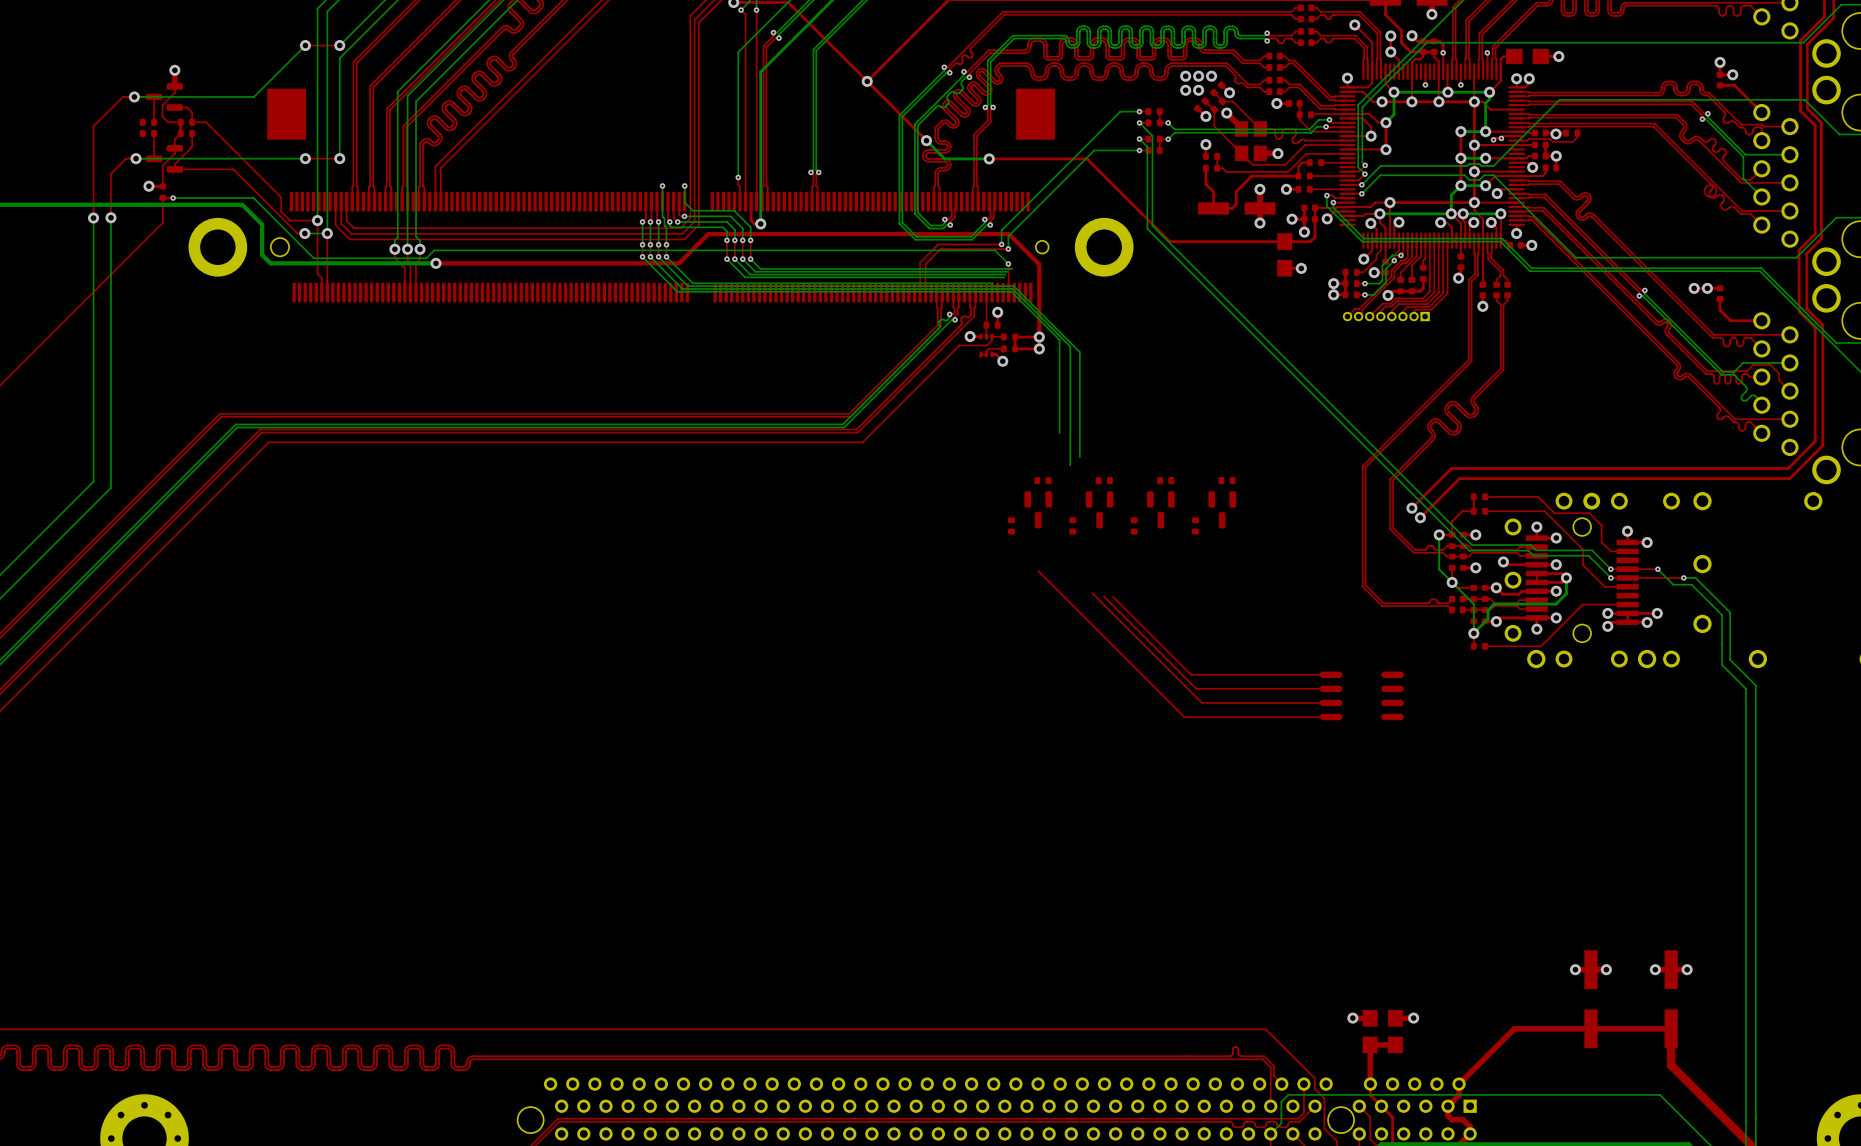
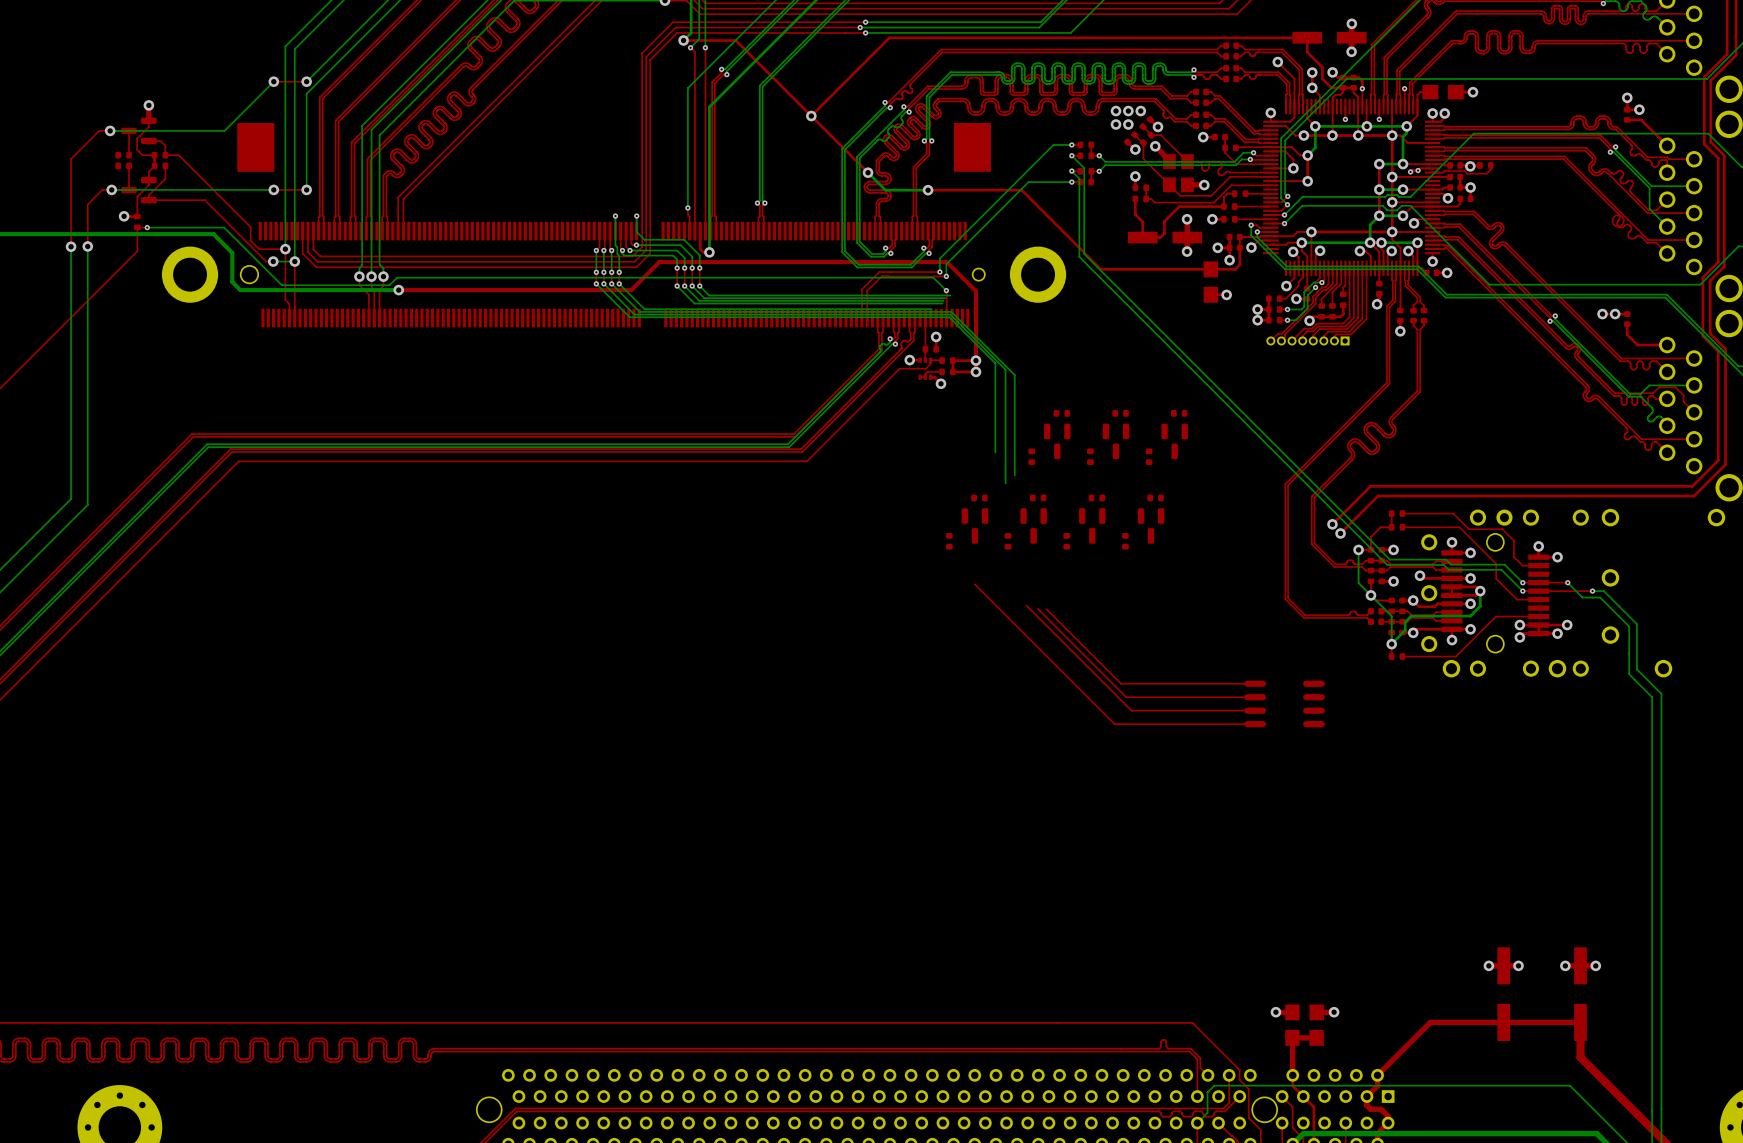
part: none -> (1061, 413)
part: none -> (1120, 413)
part: none -> (1179, 413)
part: none -> (1057, 441)
part: none -> (1115, 441)
part: none -> (1174, 441)
part: none -> (1031, 456)
part: none -> (1090, 456)
part: none -> (1149, 456)

